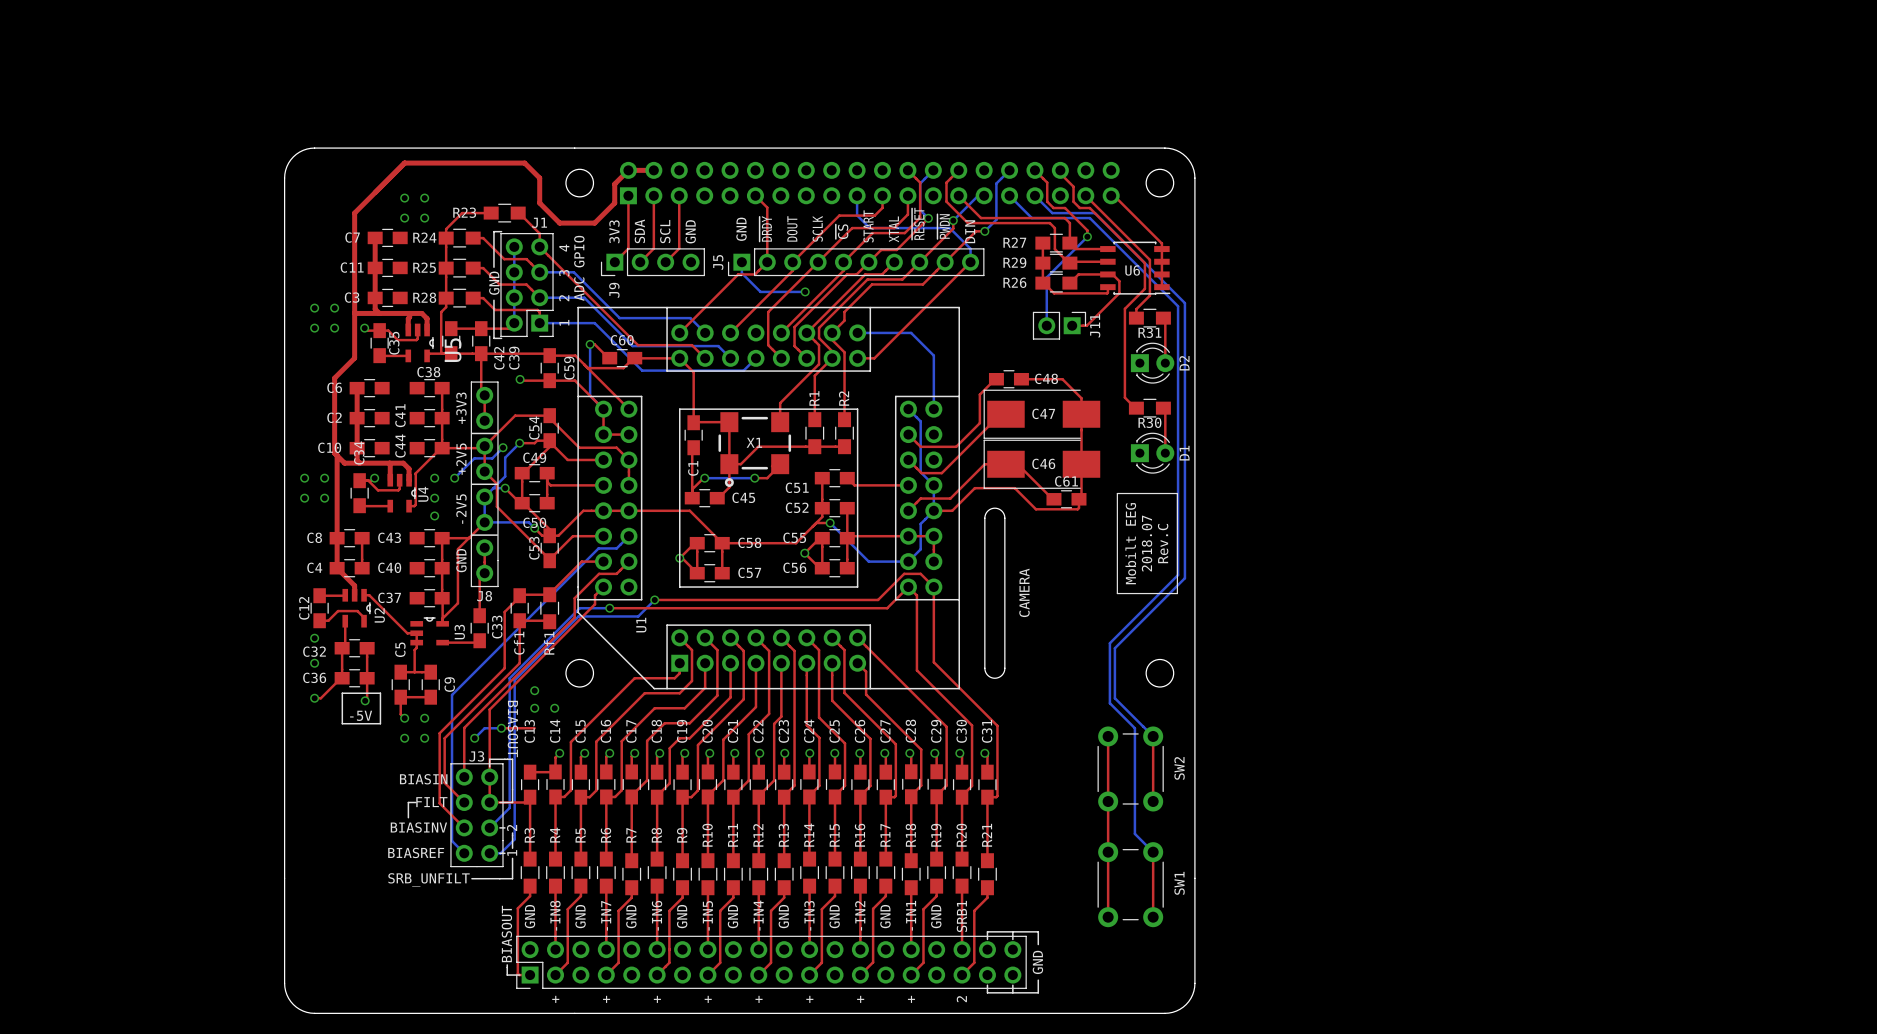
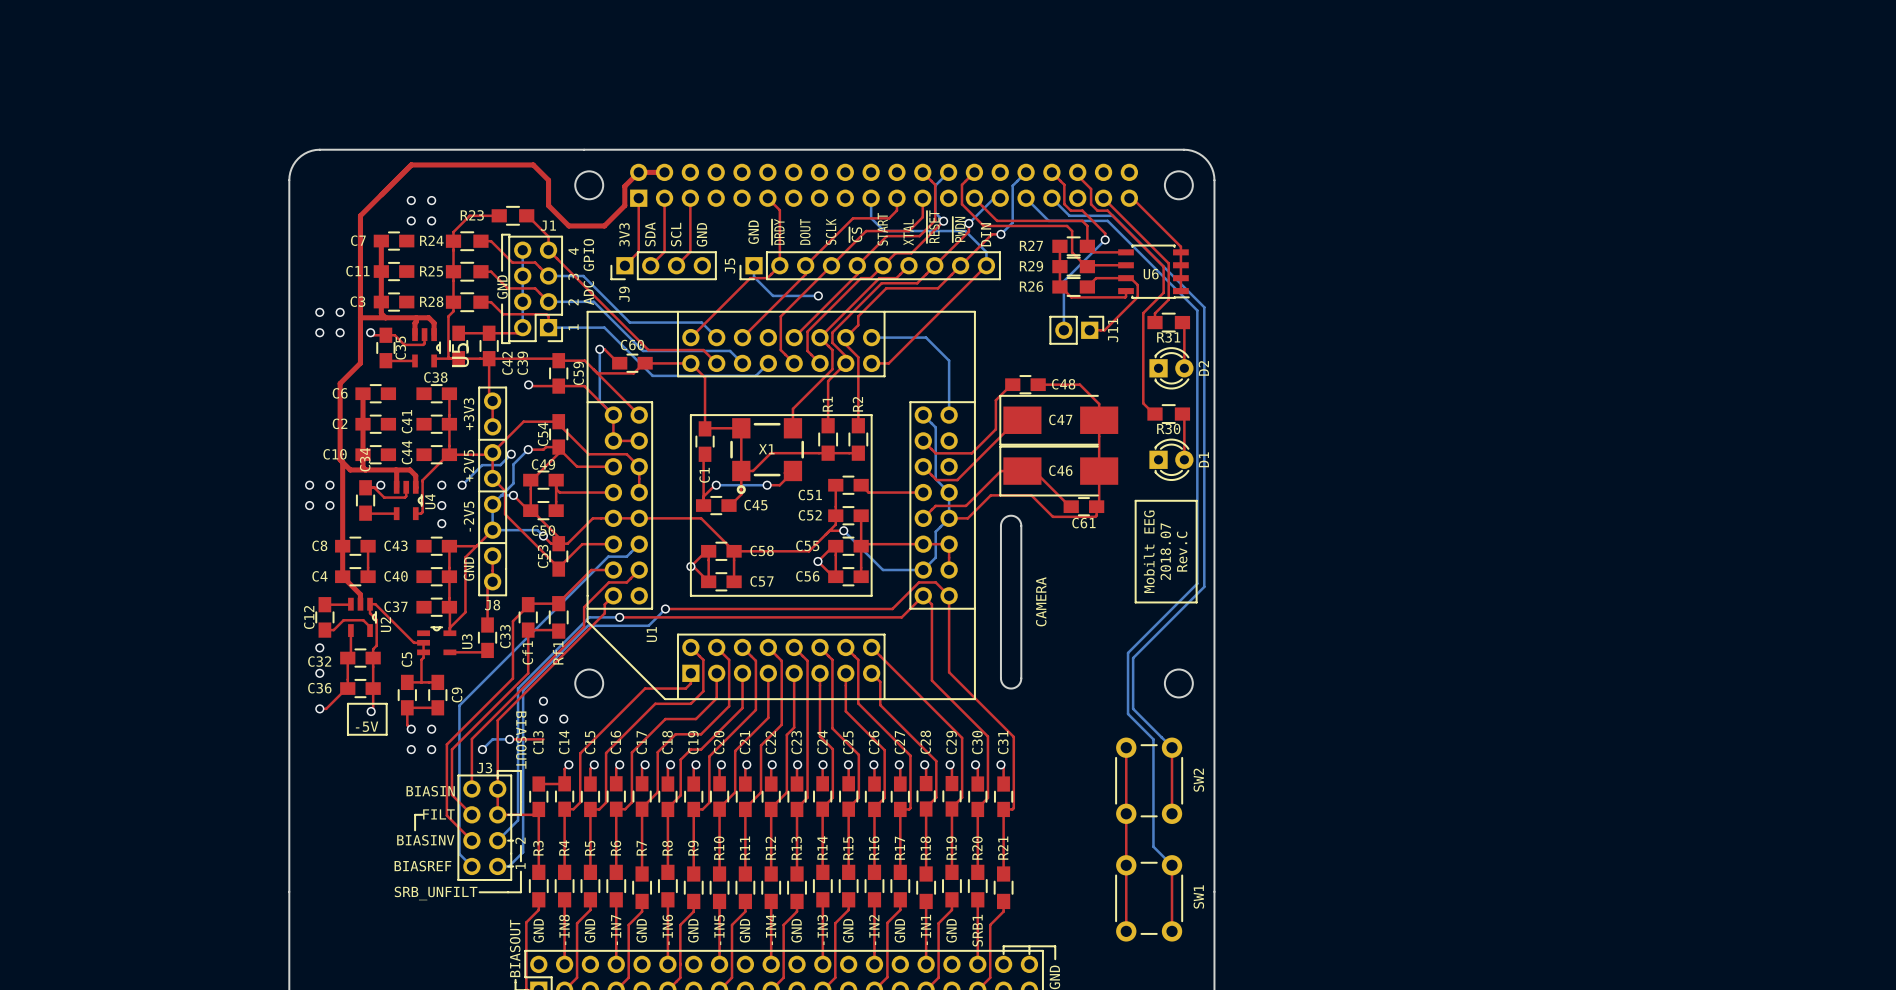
C61 name position: C61 (1066, 481) -> C61 (1083, 523)
top track: none -> (370, 604) (370, 613) (376, 619) (376, 645) (373, 649) (373, 658)

